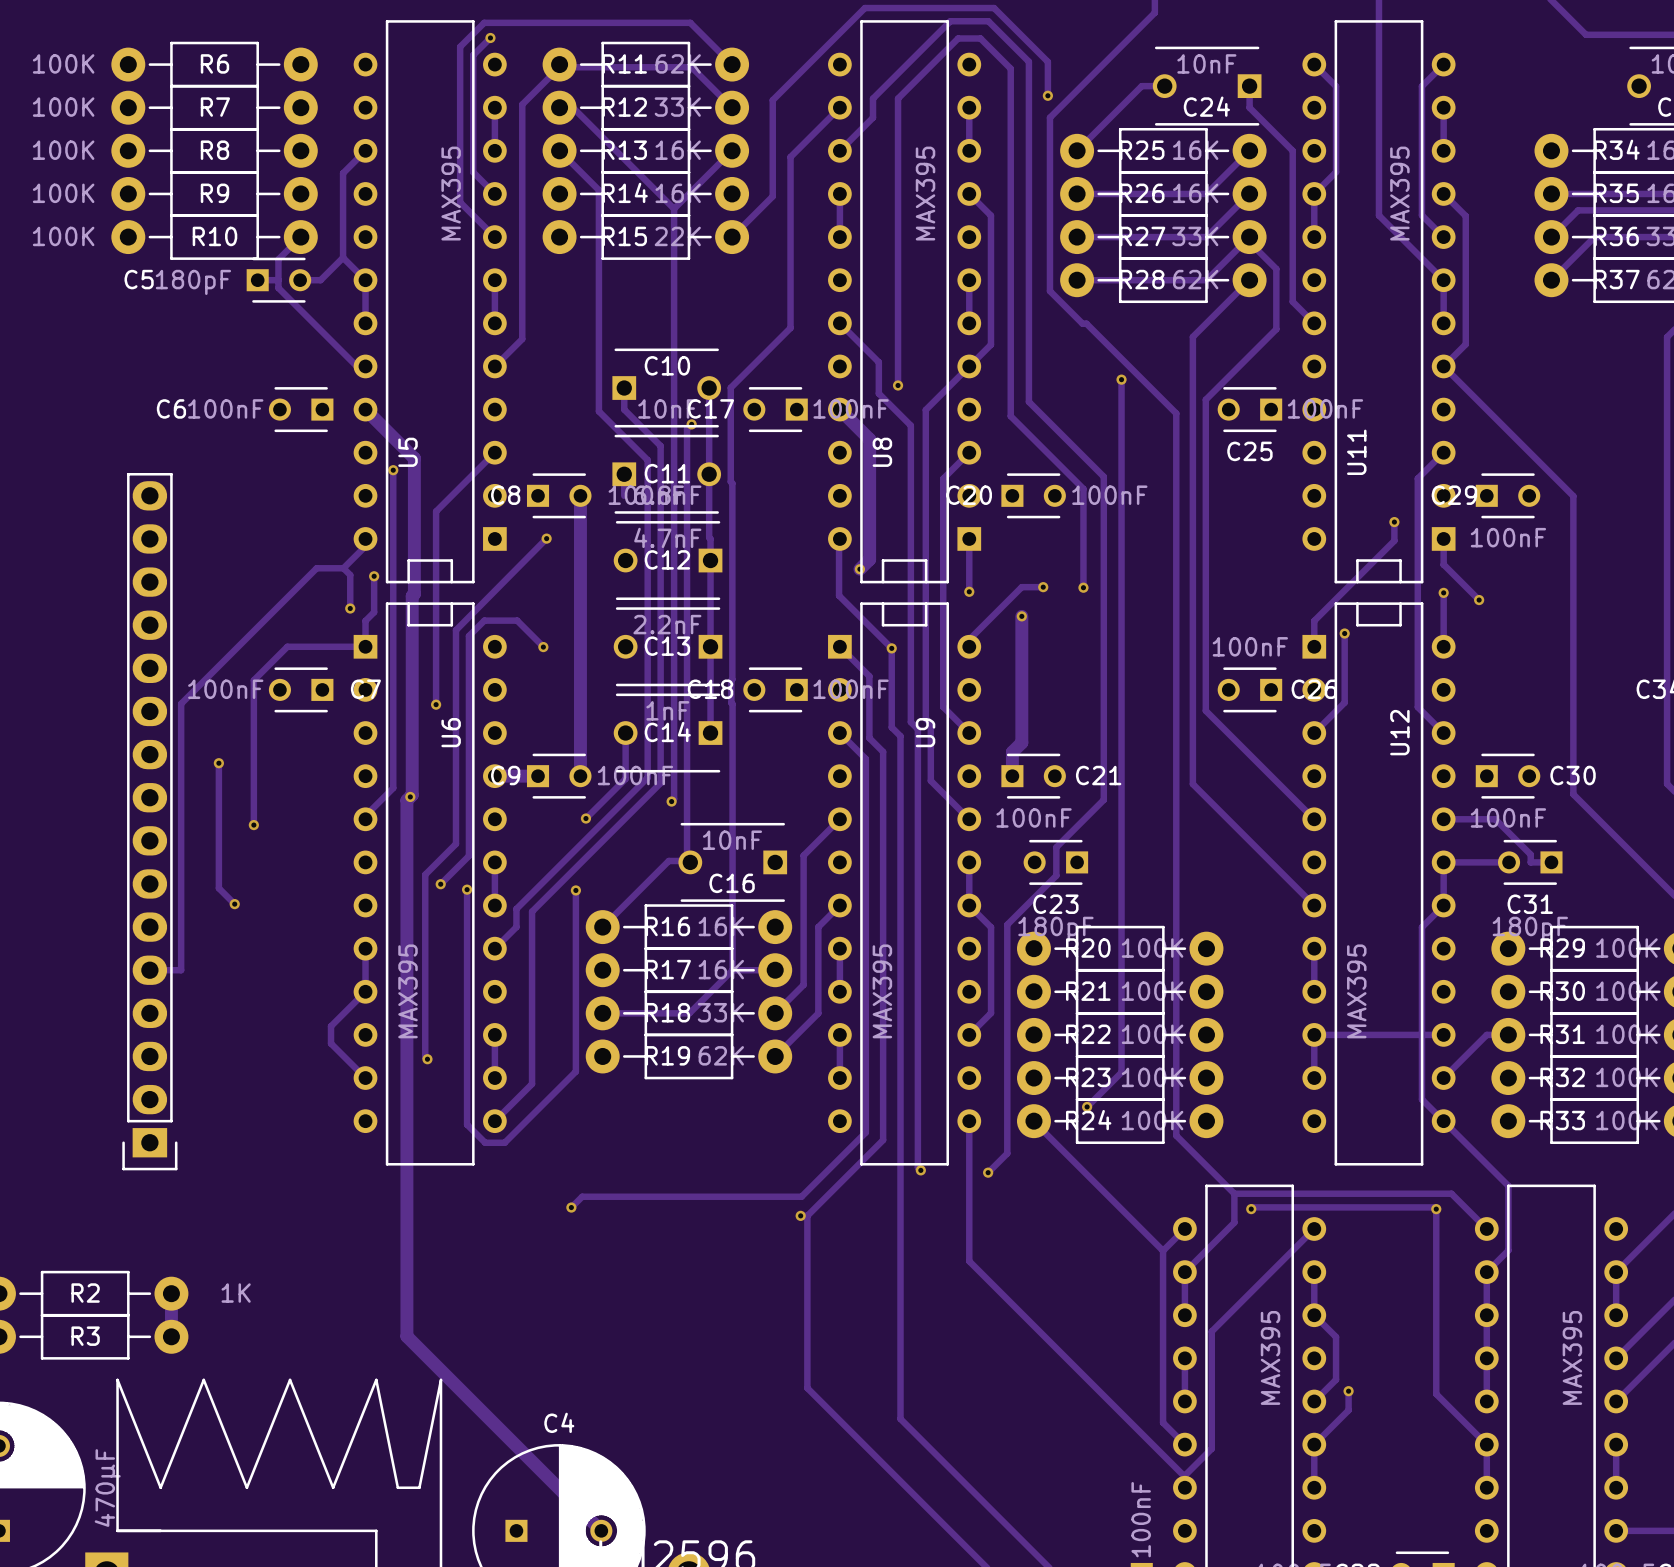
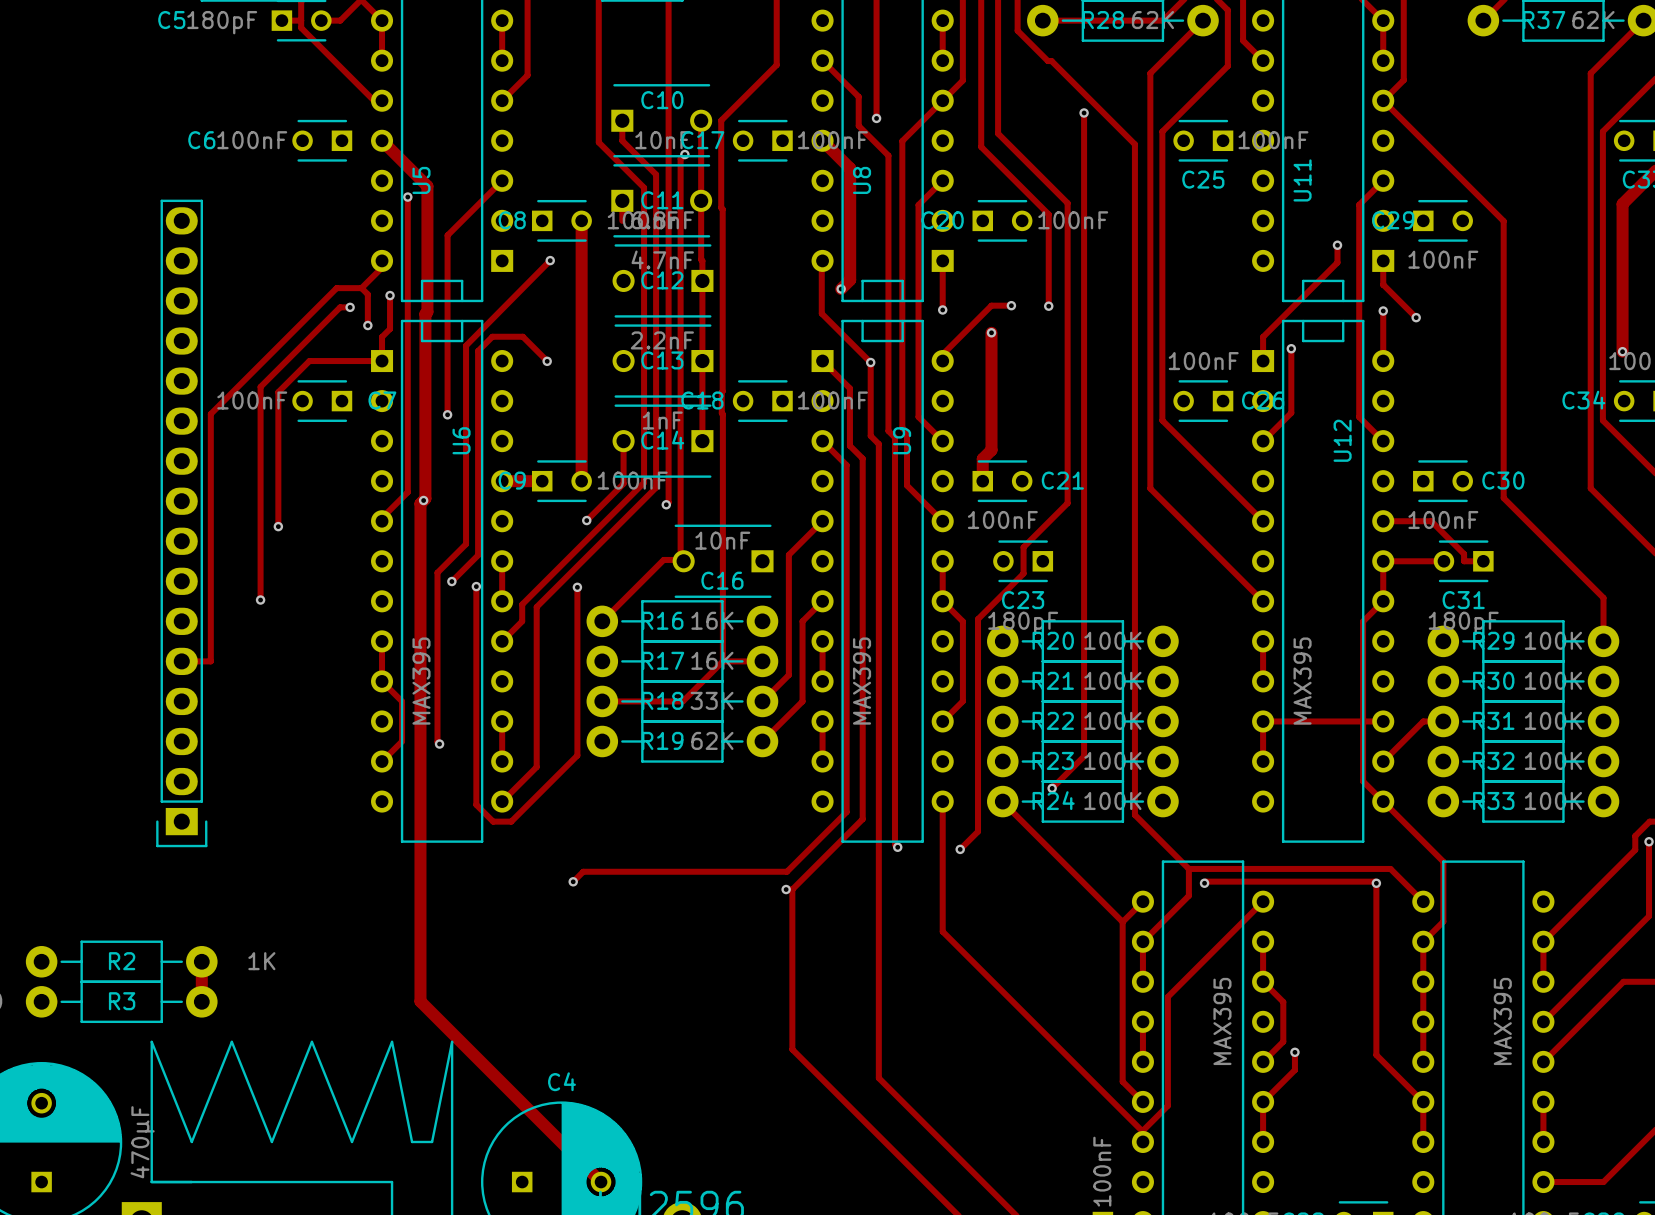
via: none -> (350, 307)
track: (218, 763) (218, 888) (234, 904) -> (350, 307) (340, 307) (260, 386) (260, 600)
via: (218, 763) -> none
track: (365, 991) (331, 1026) (331, 1043) (365, 1078) -> (382, 681) (402, 701) (402, 741) (382, 761)

